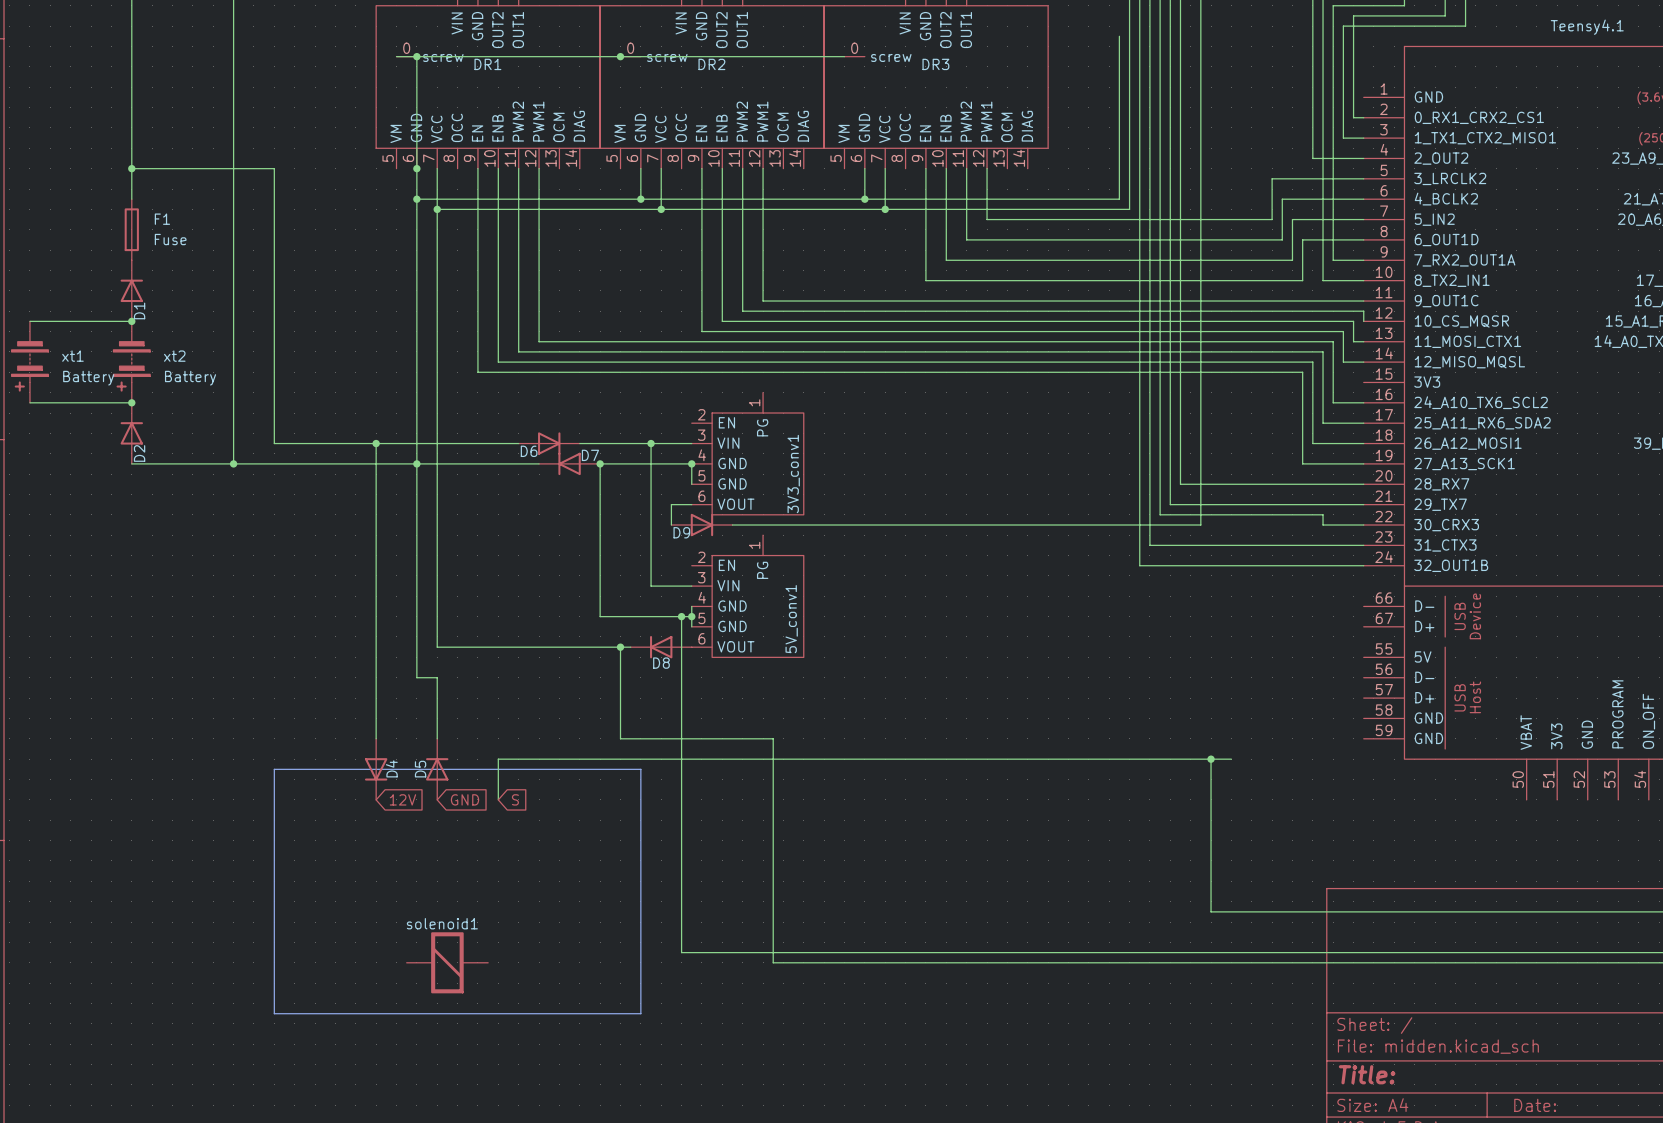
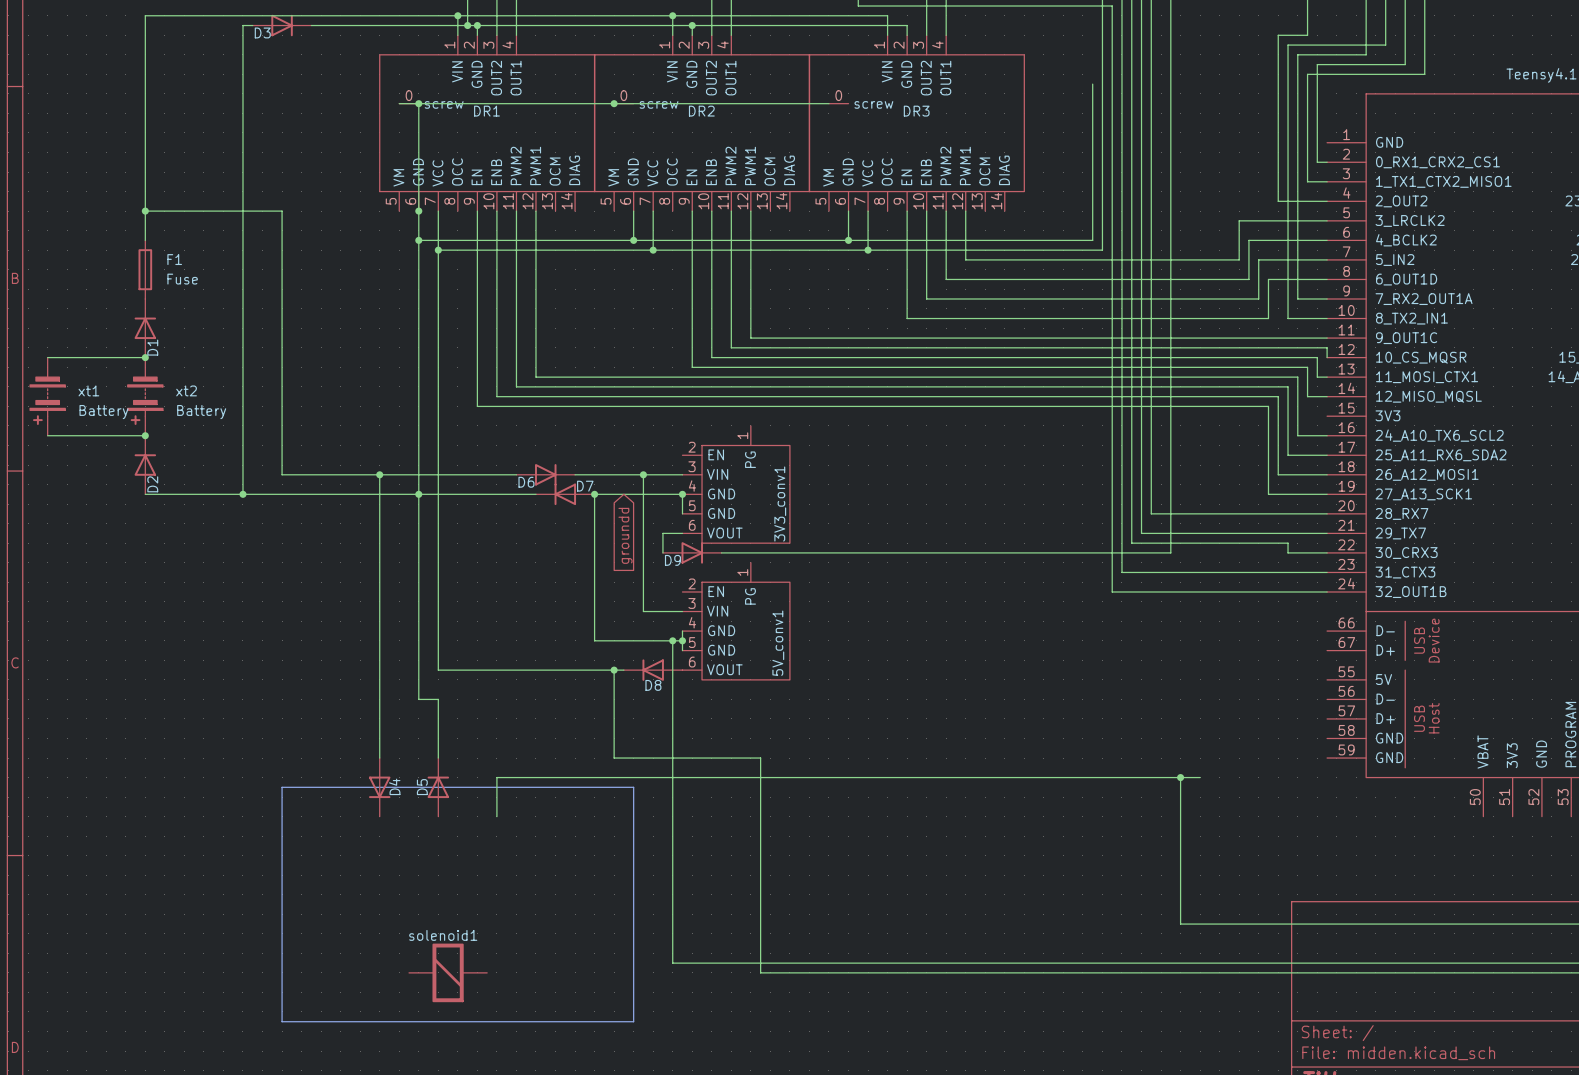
global label: none -> groundd (625, 535)
global label: 12V (402, 799) -> none
global label: GND (465, 799) -> none
global label: S (515, 799) -> none

